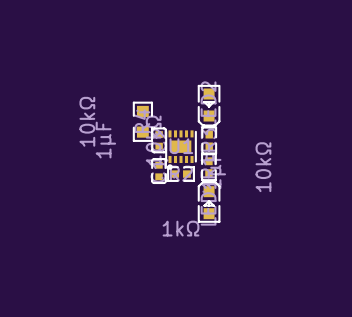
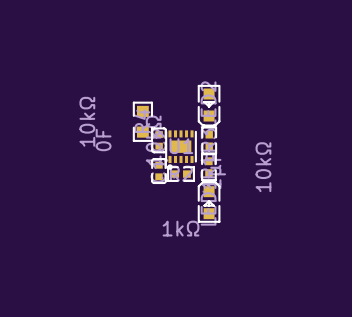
part value: 1µF (105, 140) -> 0F (103, 140)

